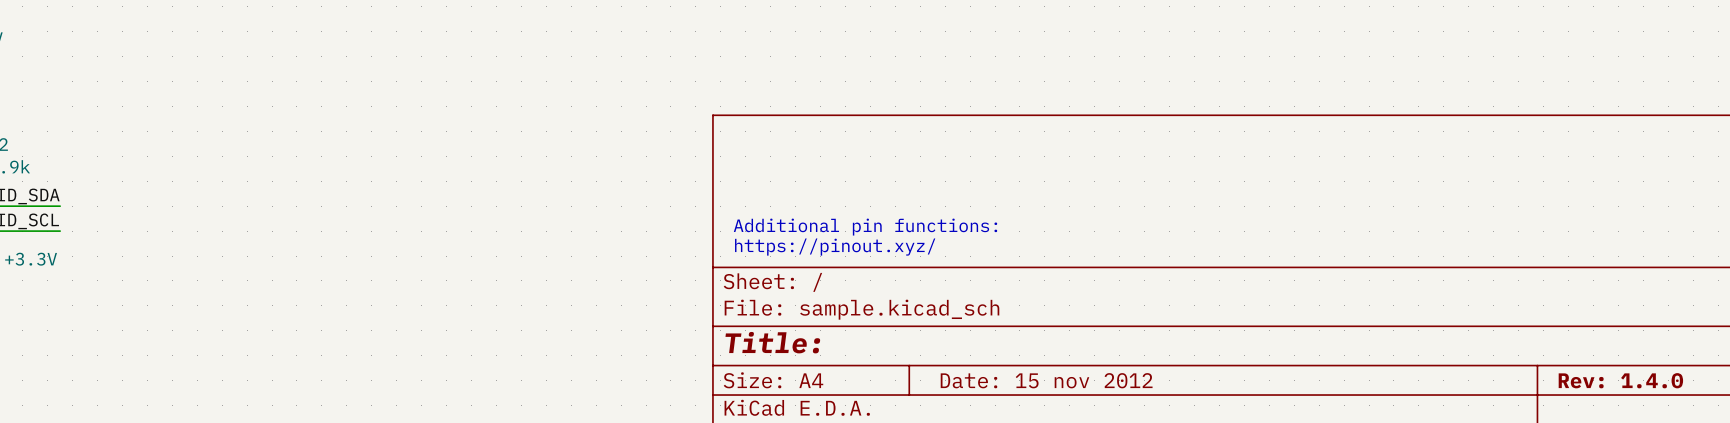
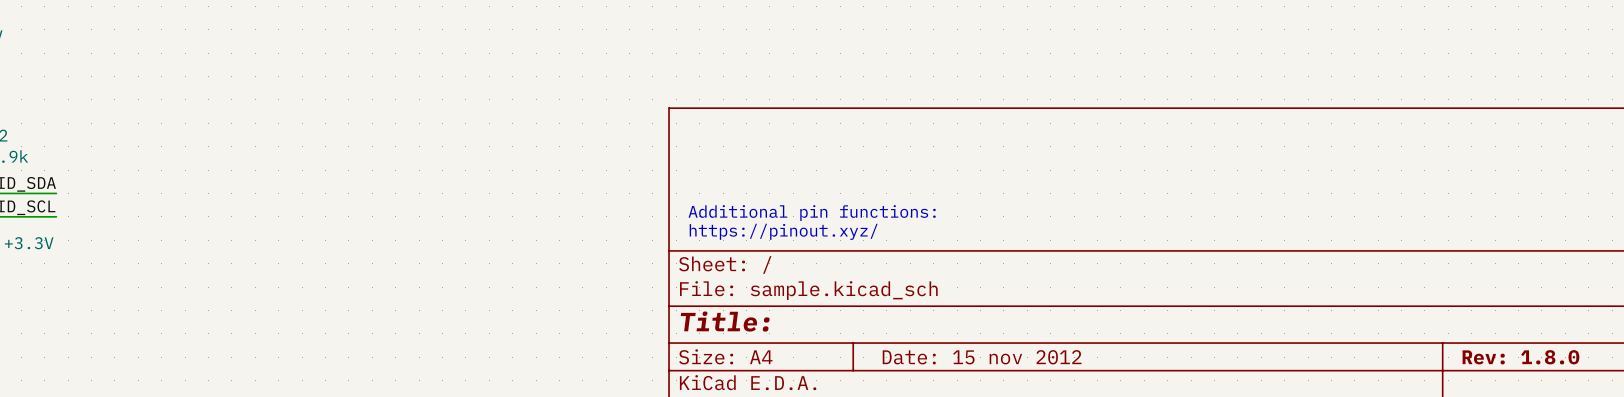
title block: Rev: 1.4.0 (1620, 380) -> Rev: 1.8.0 (1520, 357)

